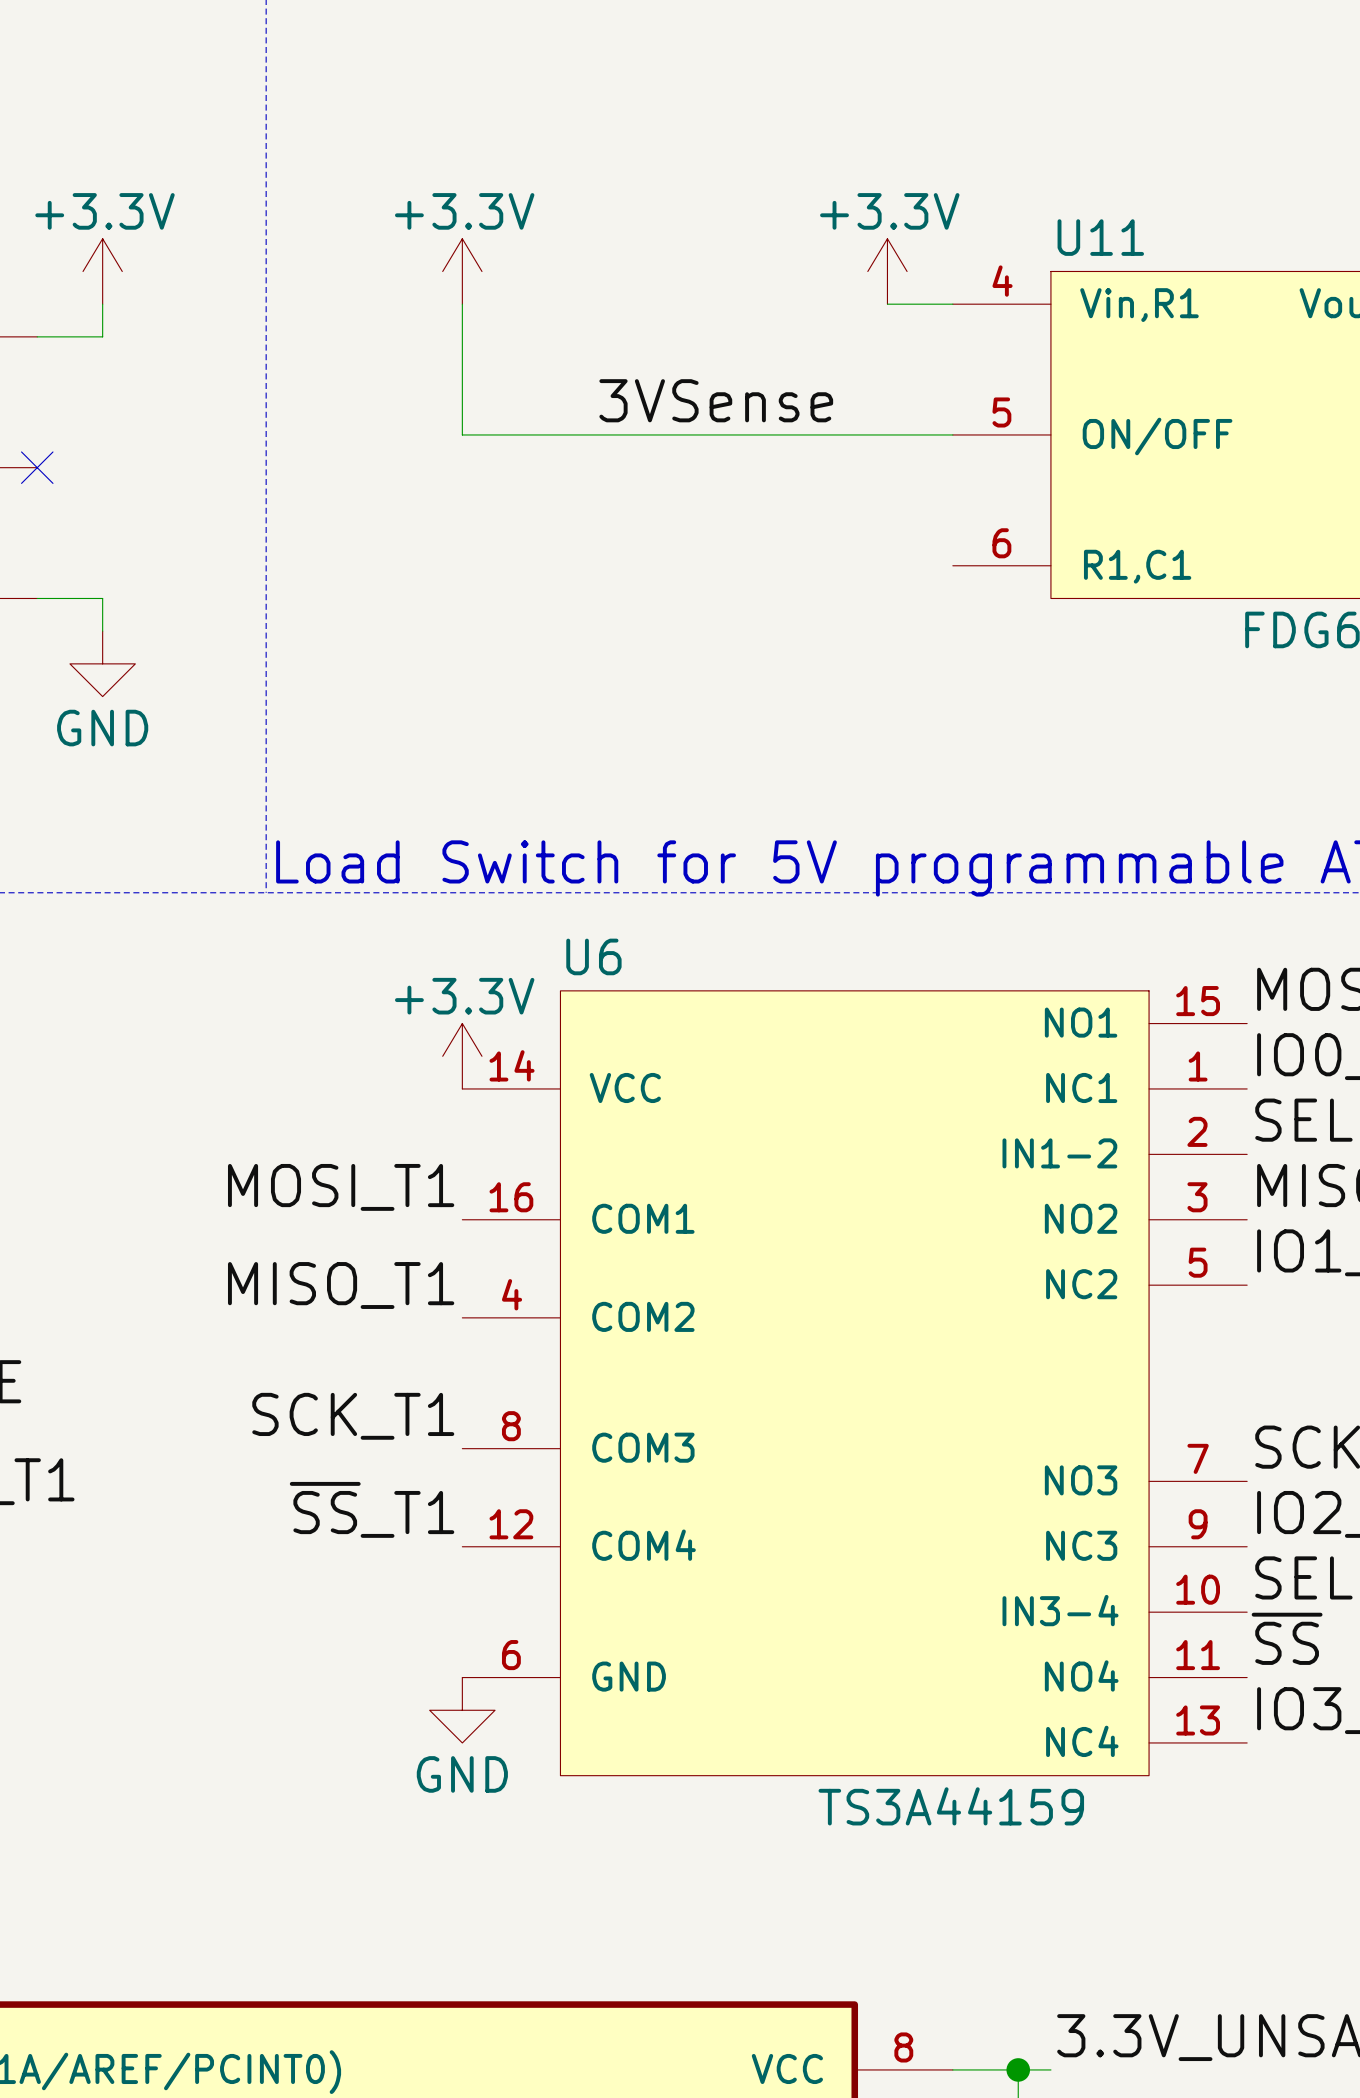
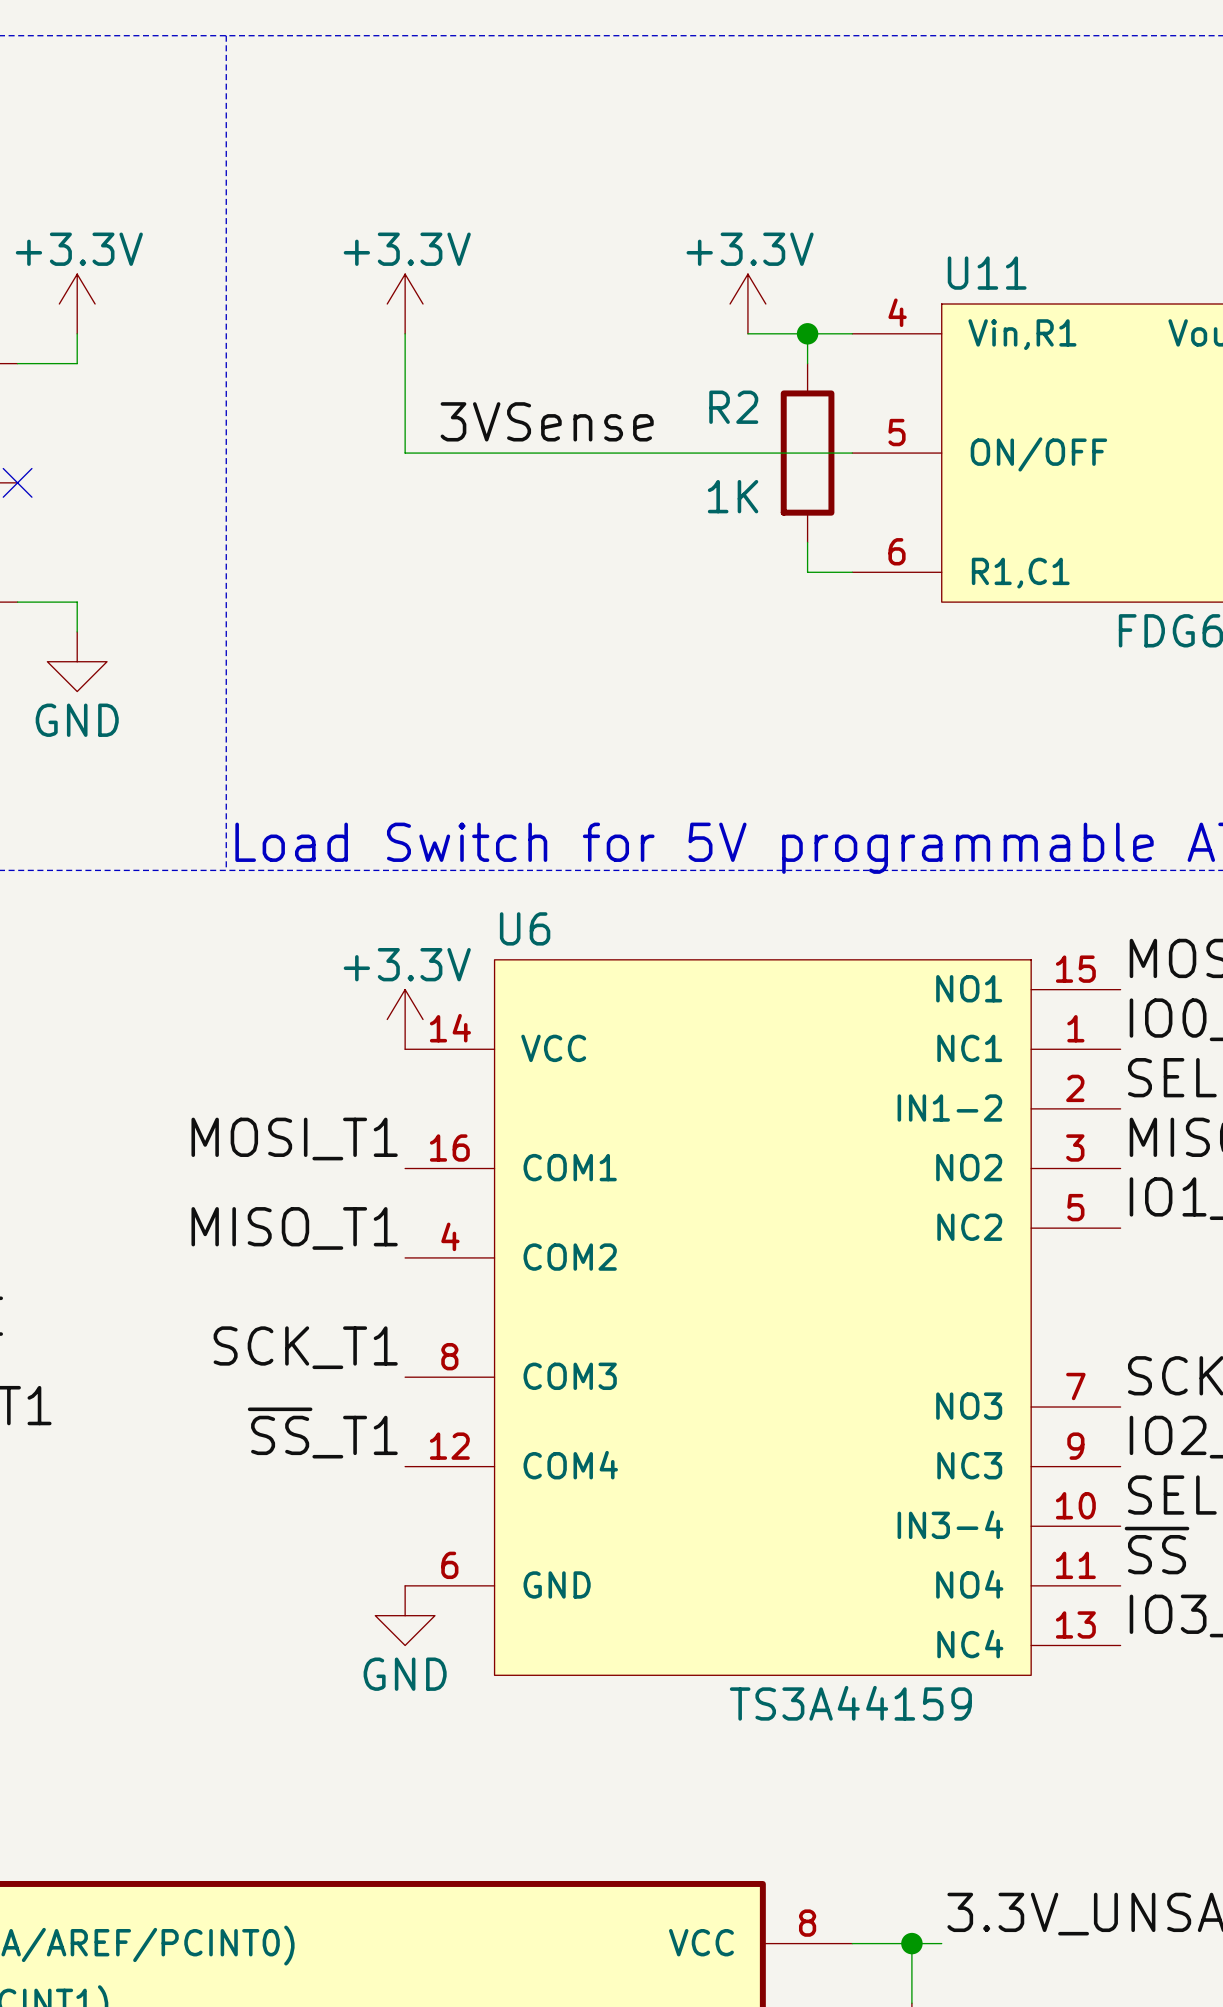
power symbol position: +3.3V (887, 271) -> +3.3V (747, 304)
wire: none -> (747, 333) (792, 333)
wire: none -> (807, 333) (807, 363)
junction: none -> (807, 333)
label position: 3VSense (716, 400) -> 3VSense (547, 421)
R2: none -> 1K (807, 453)
wire: none -> (807, 542) (807, 572) (852, 572)

